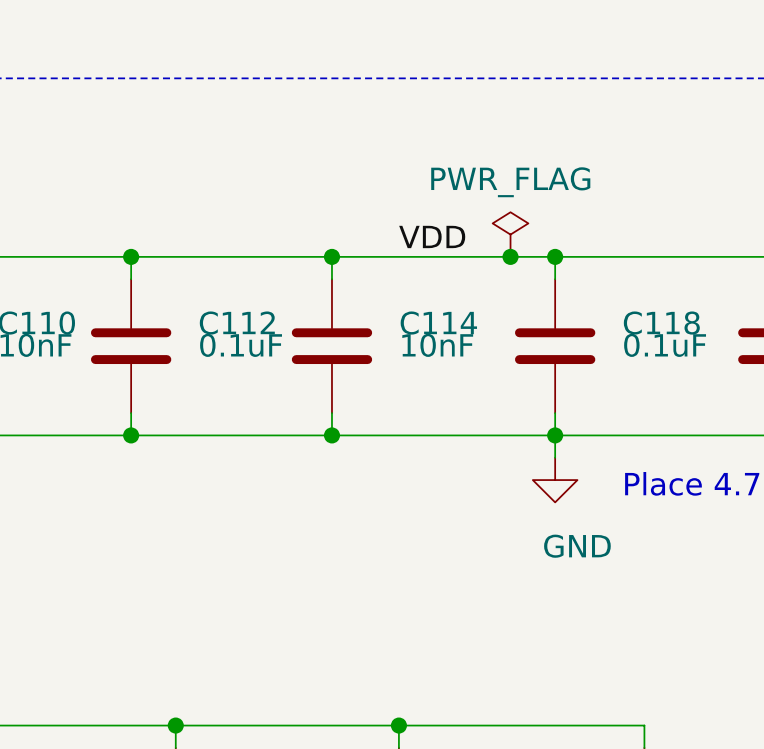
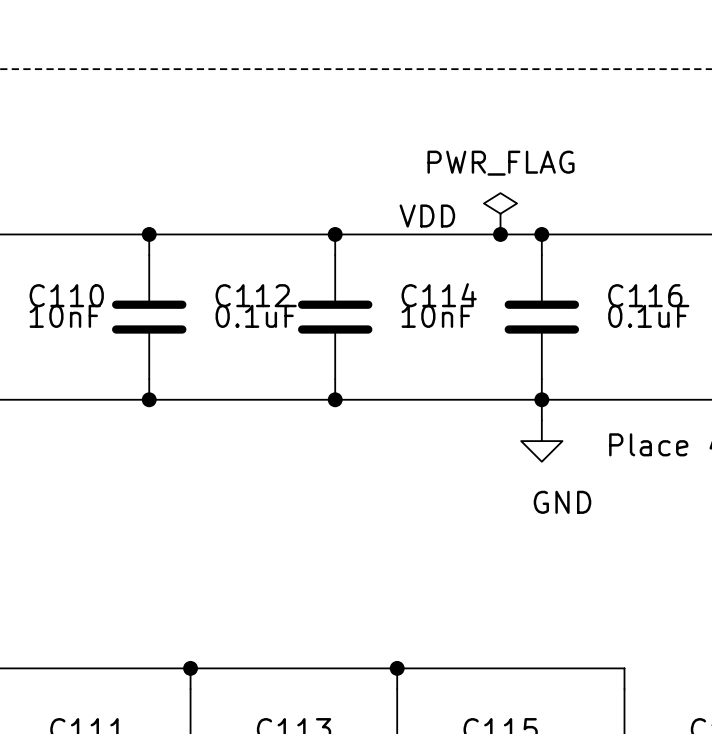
C118 name: C118 (661, 323) -> C116 (645, 295)

